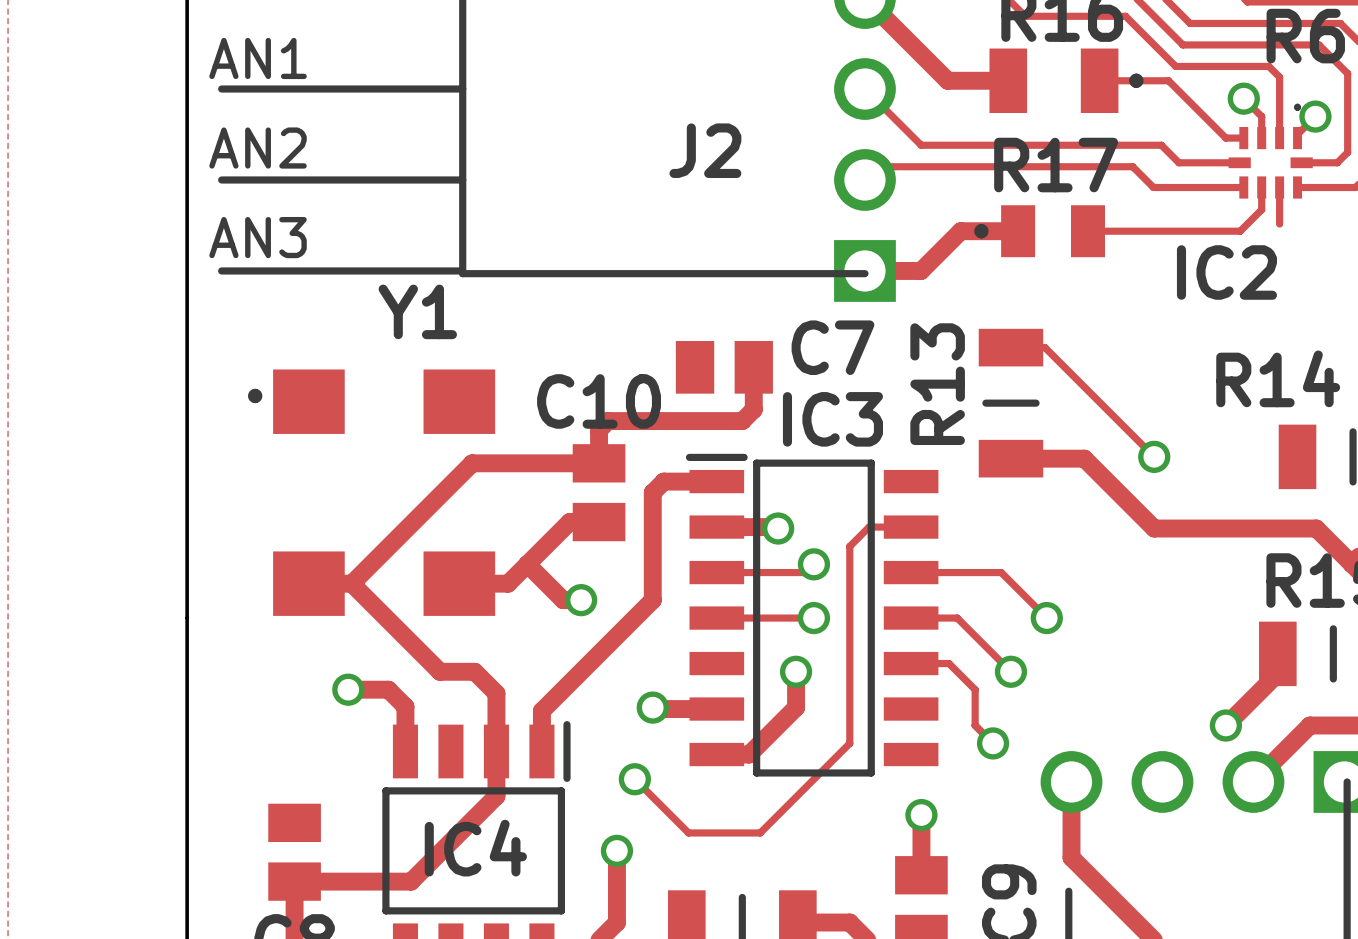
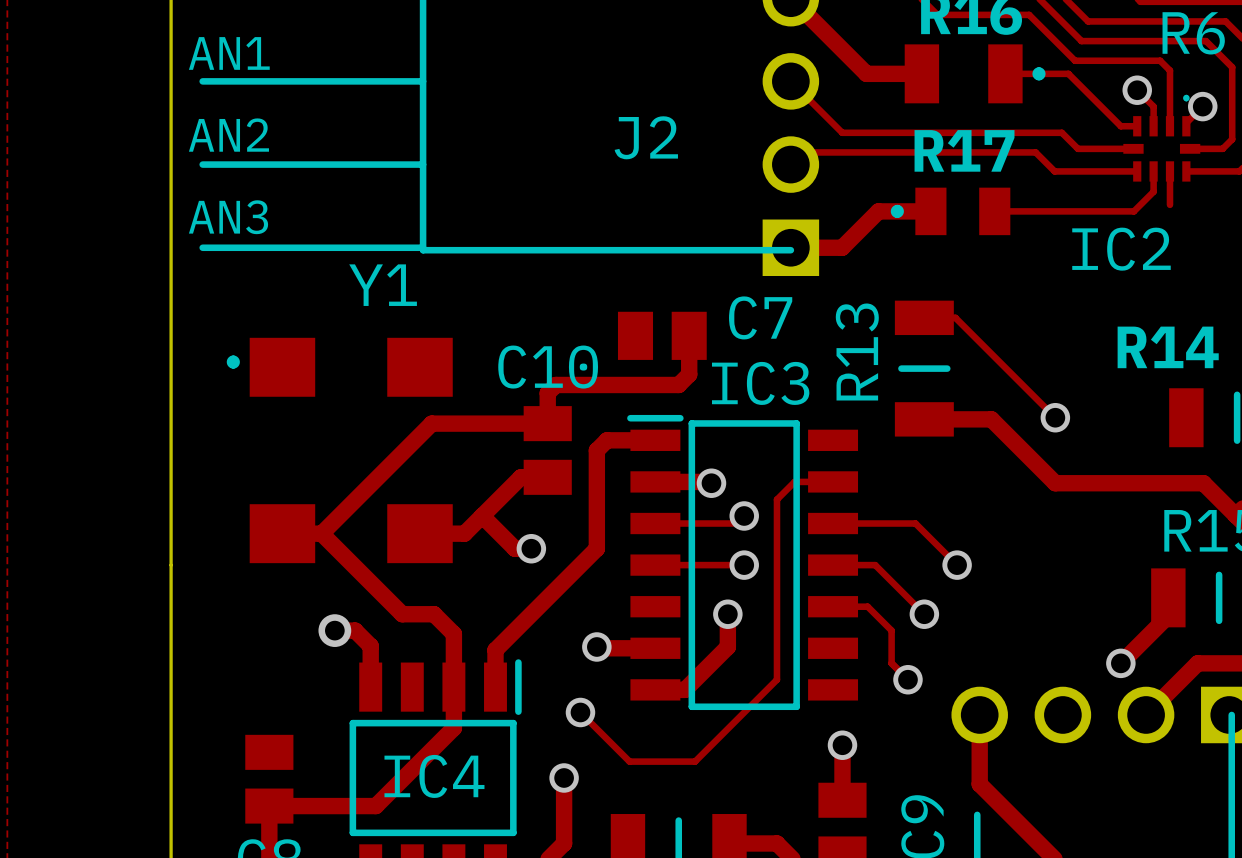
via position: (348, 689) -> (334, 630)

